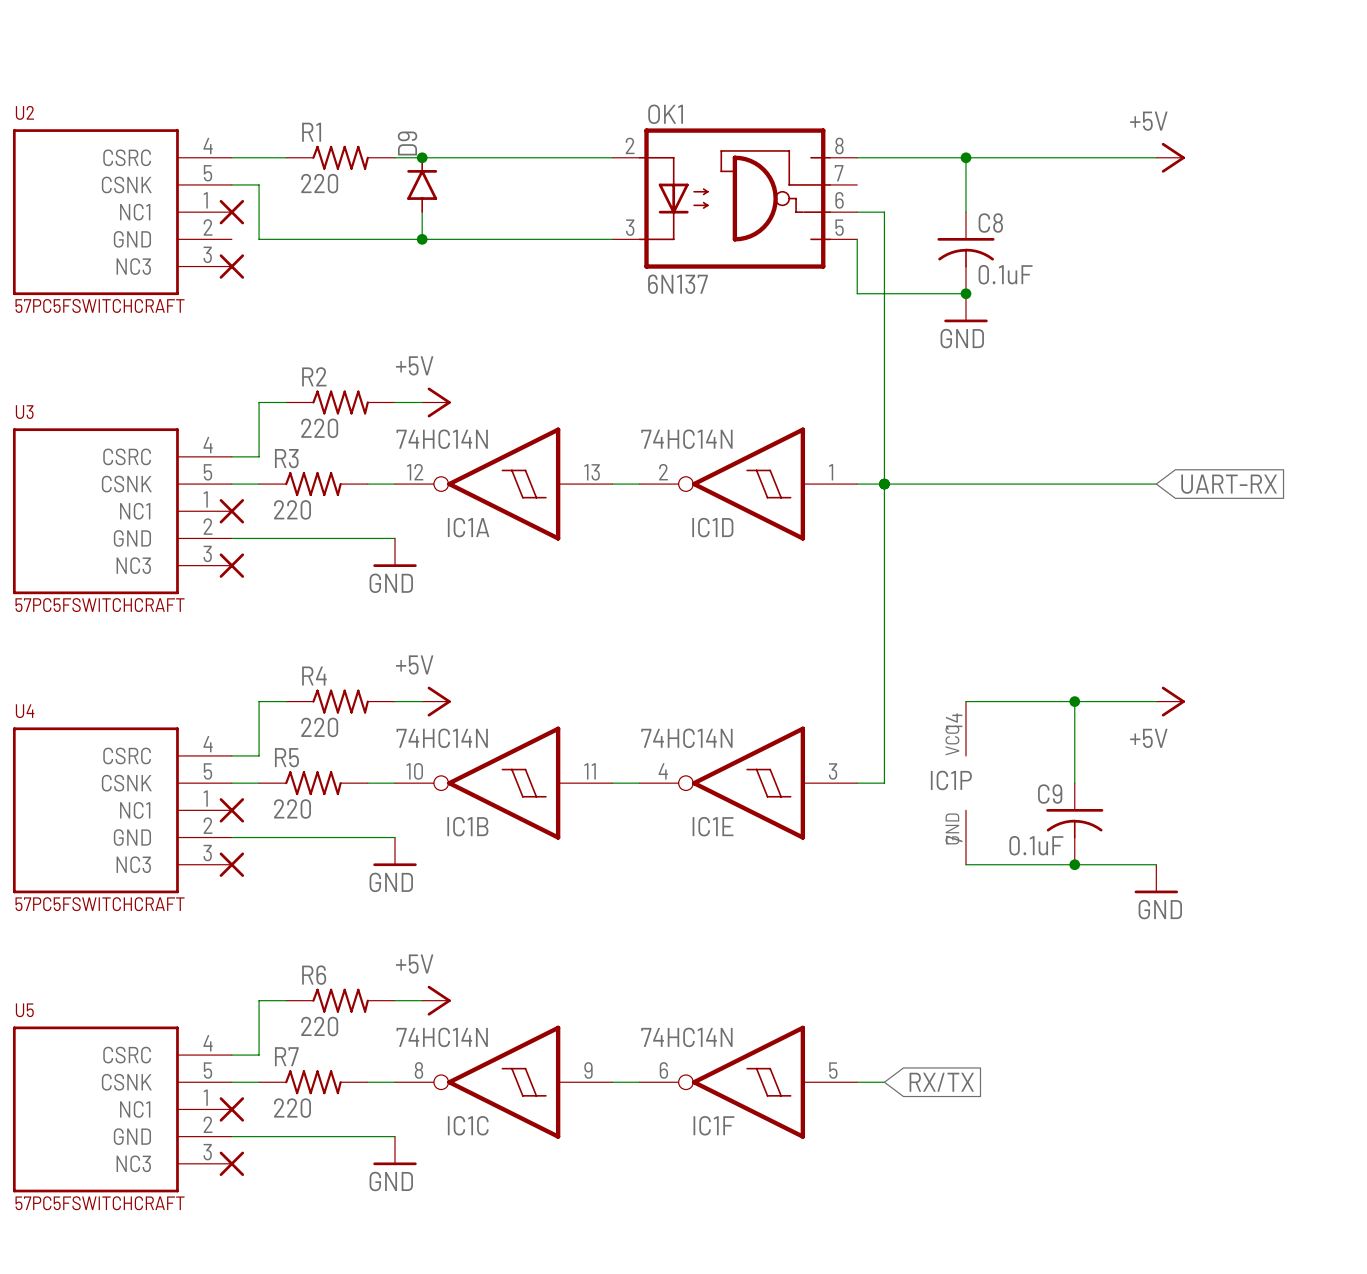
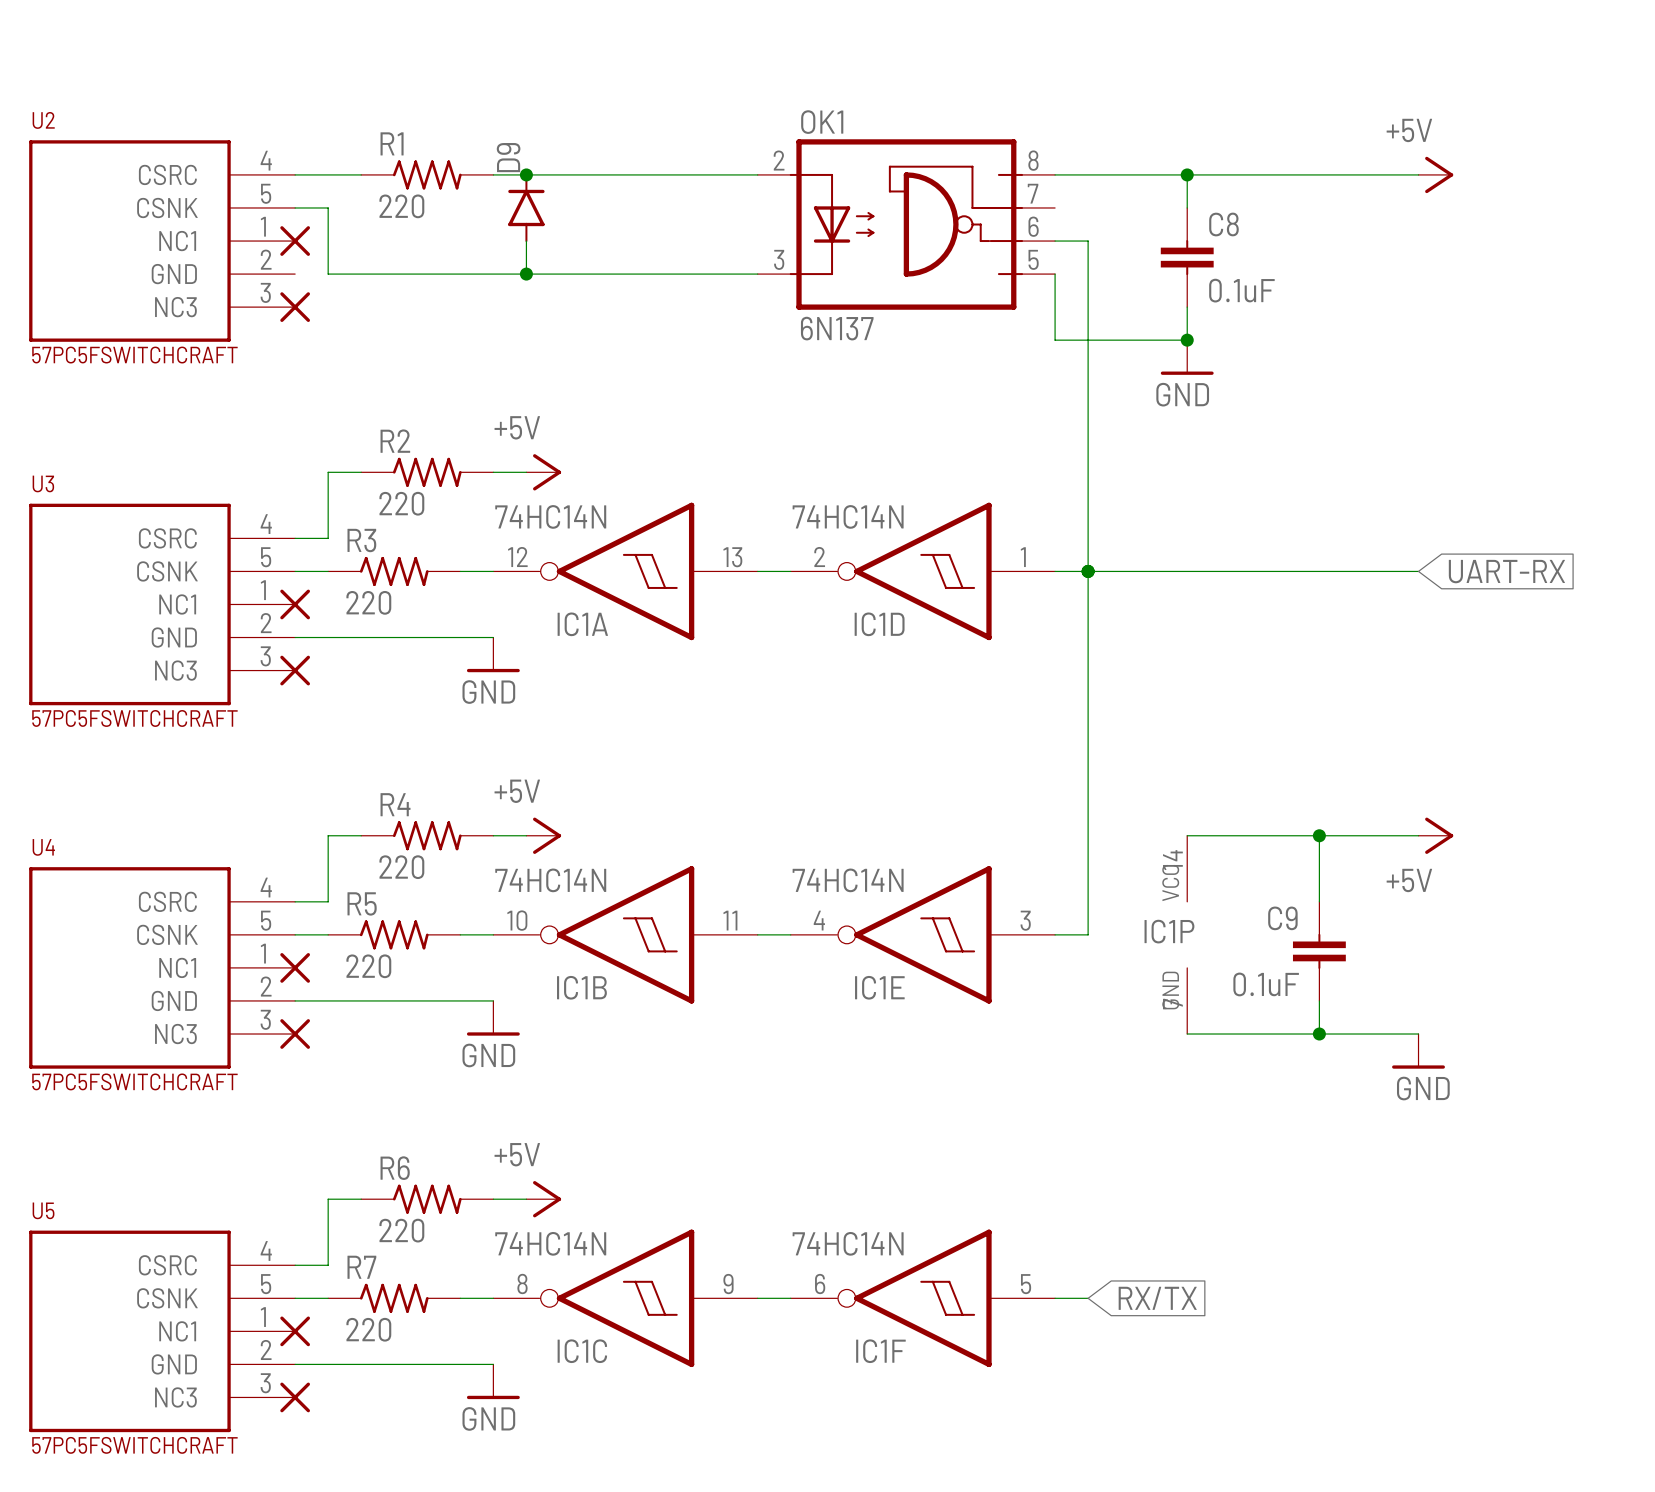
C8 symbol: [937, 212, 995, 294] -> [1160, 207, 1214, 308]
C9 symbol: [1046, 783, 1104, 865] -> [1292, 901, 1346, 1001]

